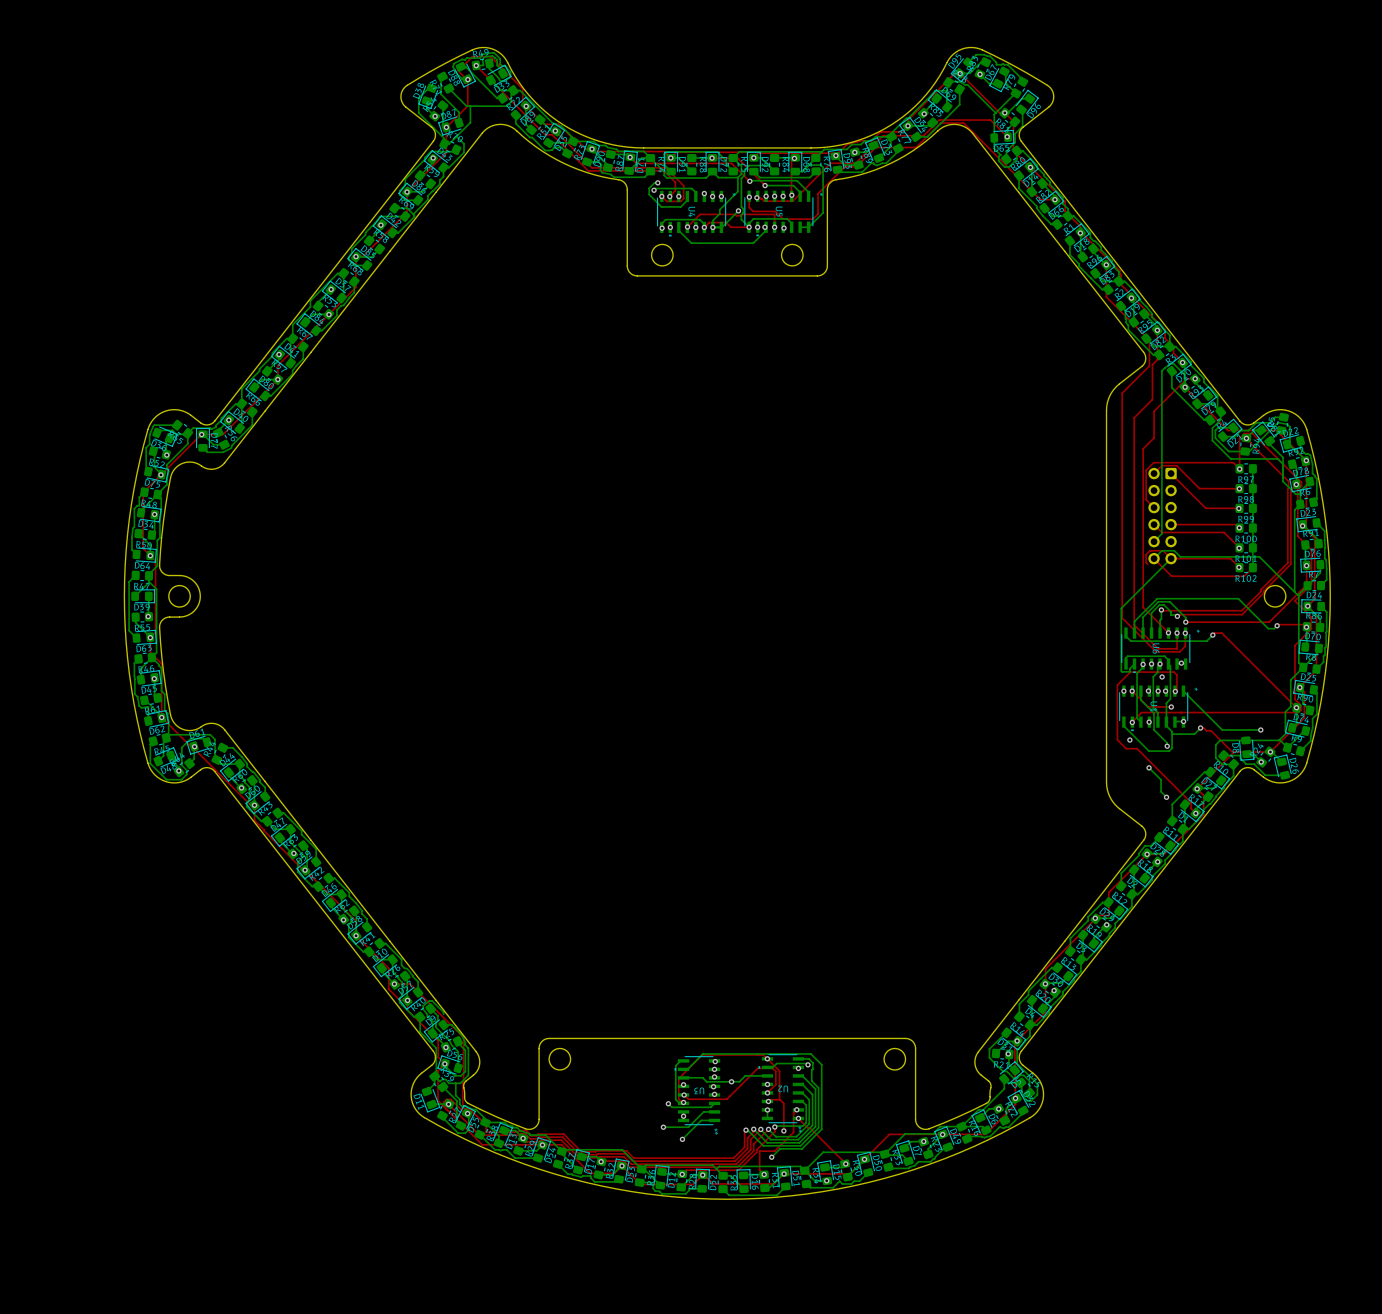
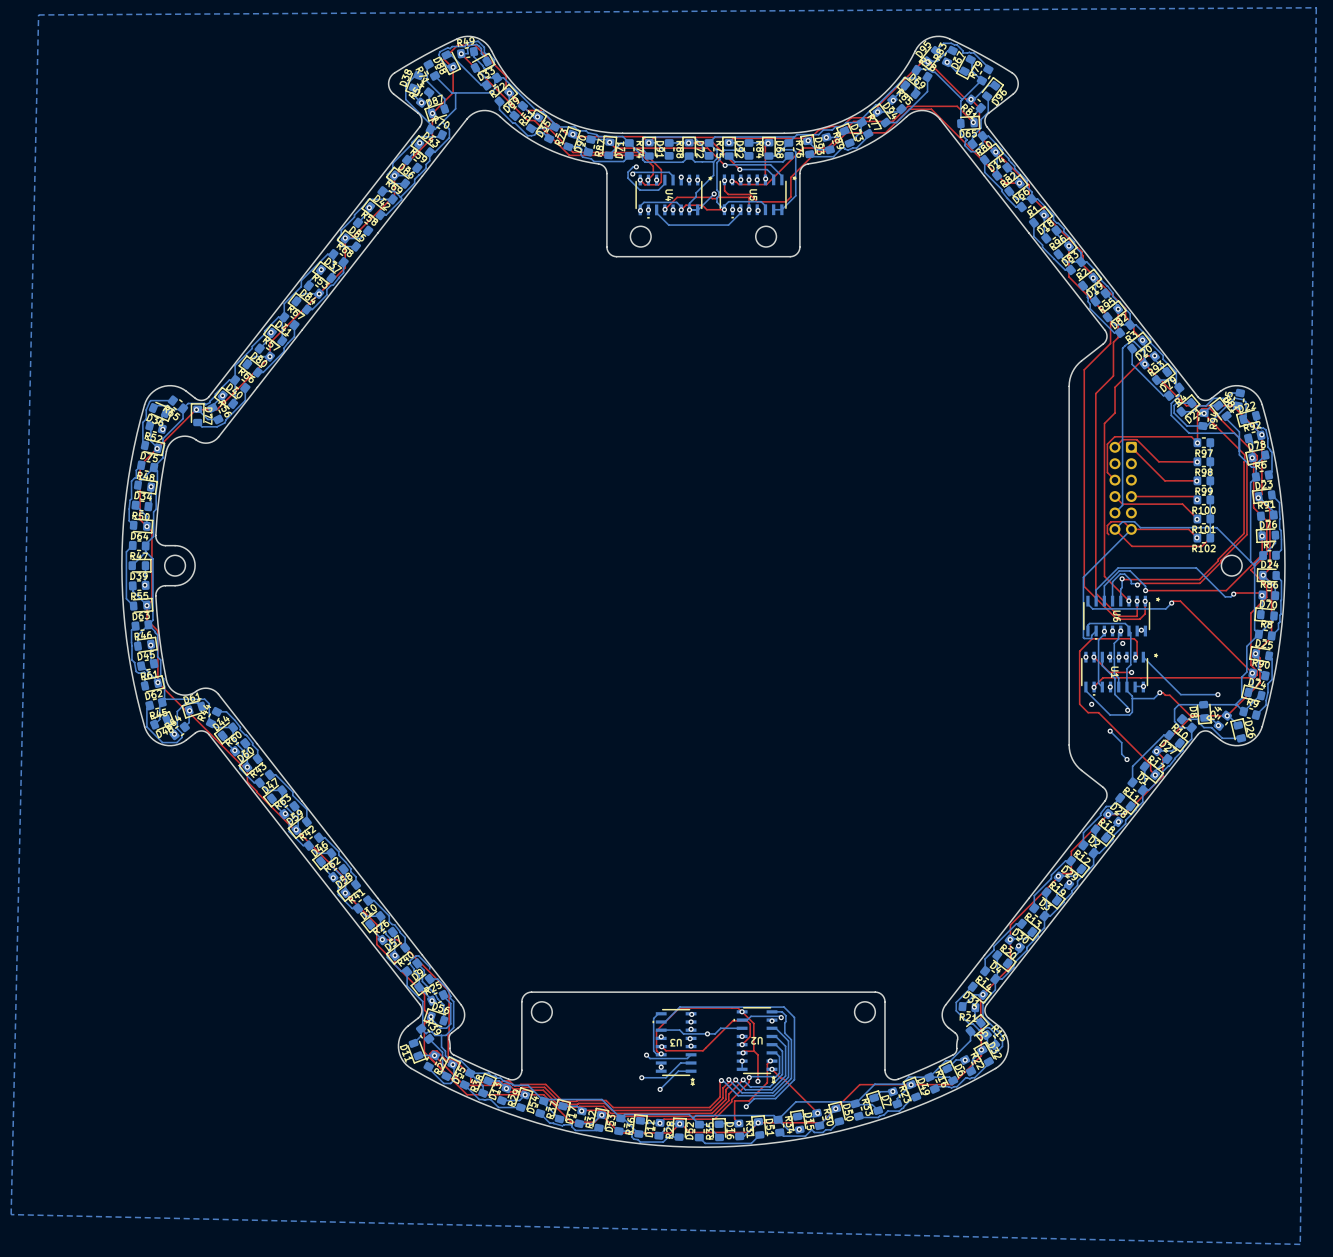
bottom zone outline: none -> (1316, 7) (38, 14) (11, 1214) (1300, 1244) (1316, 7)

